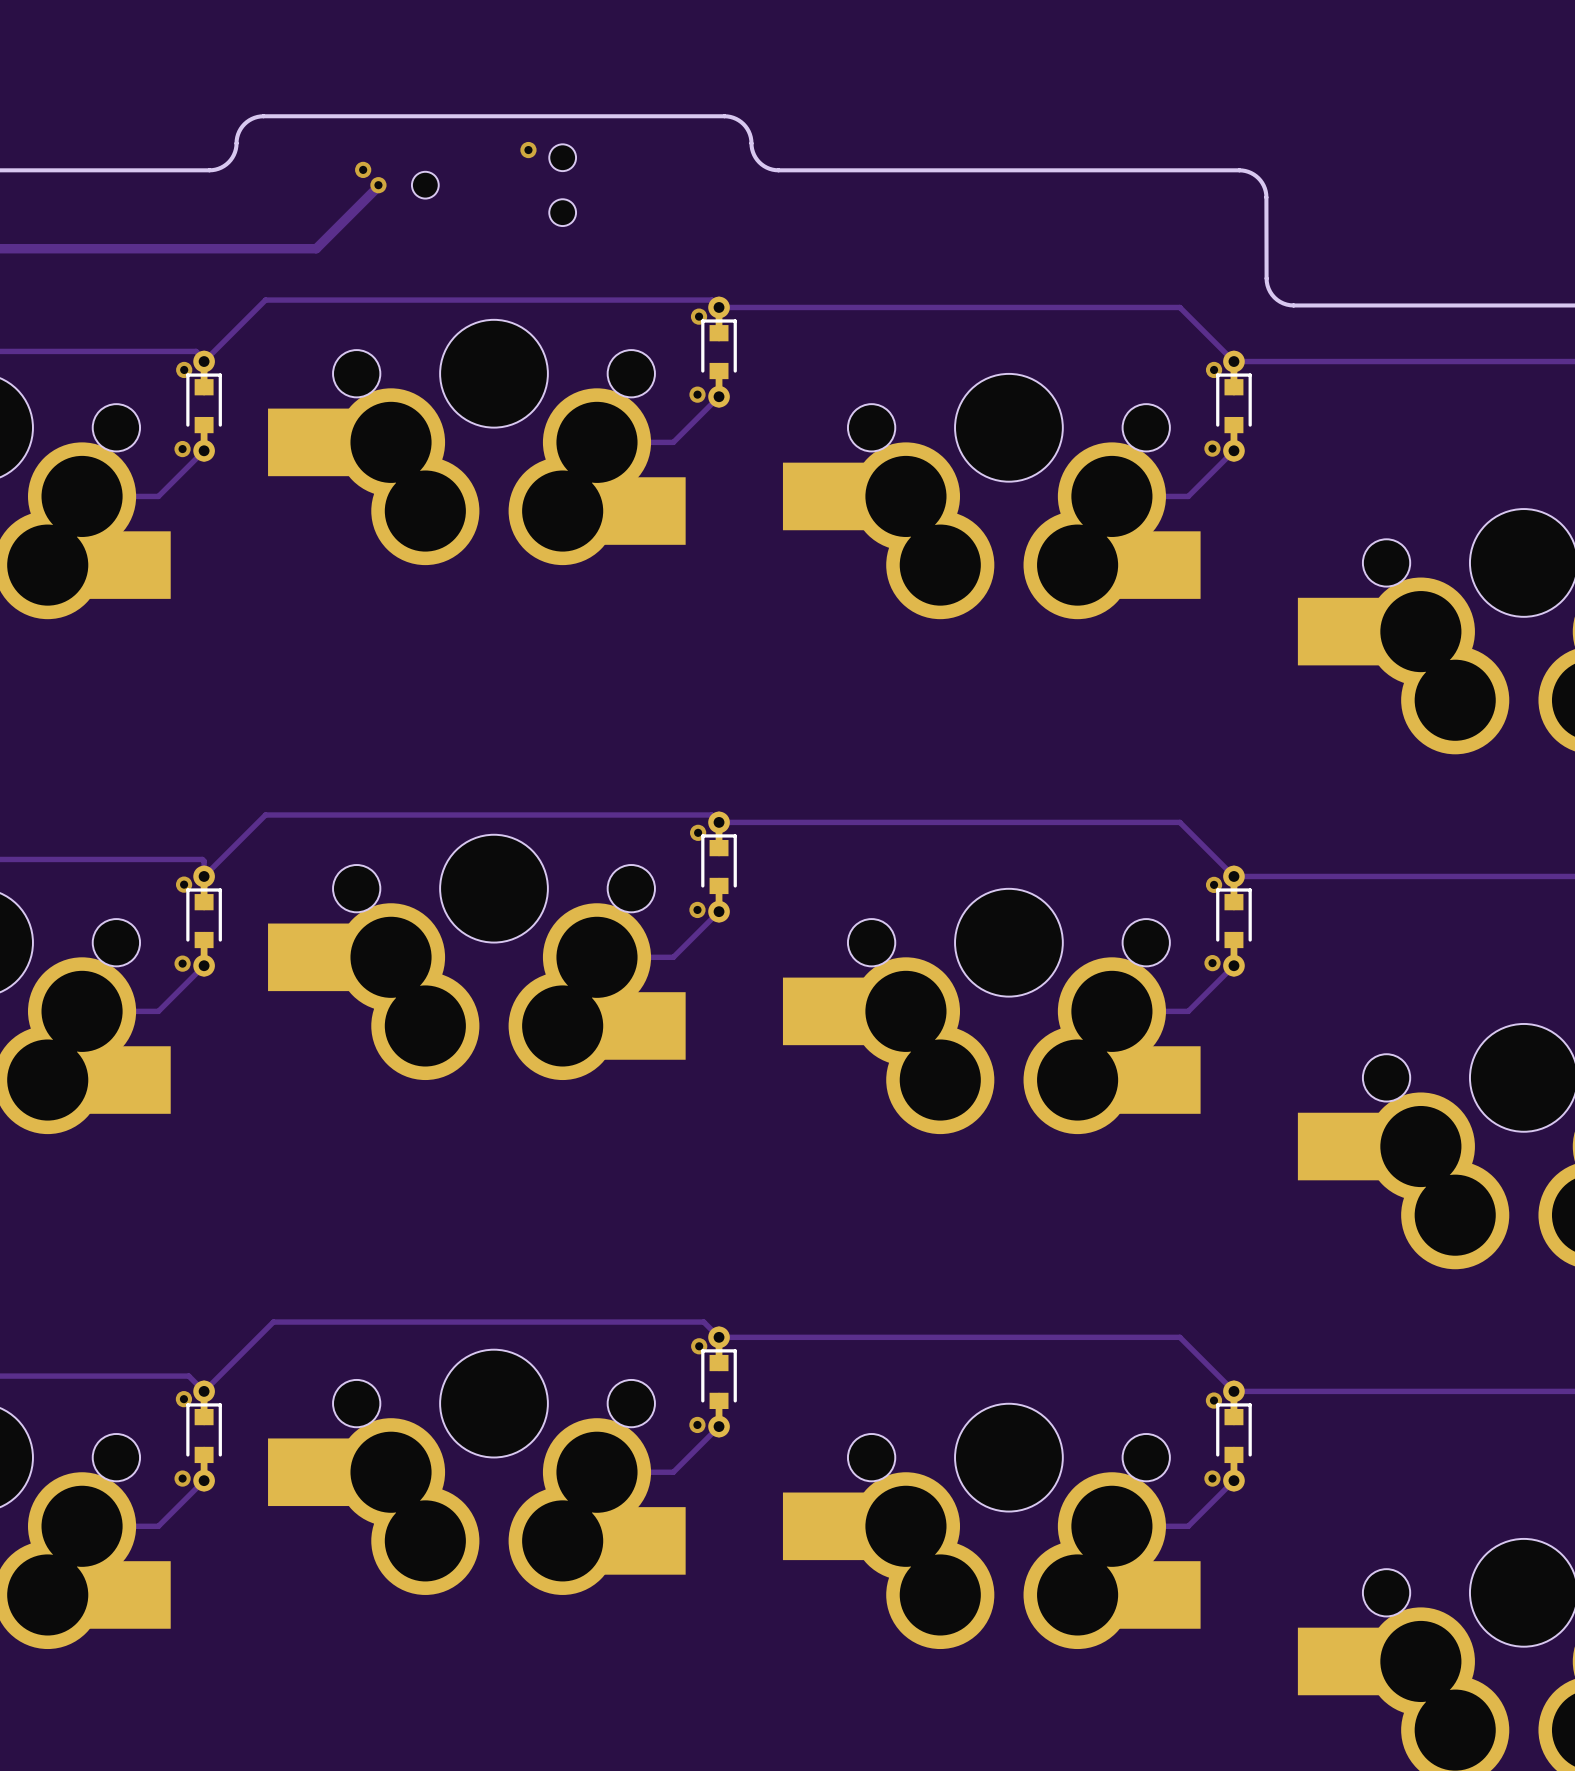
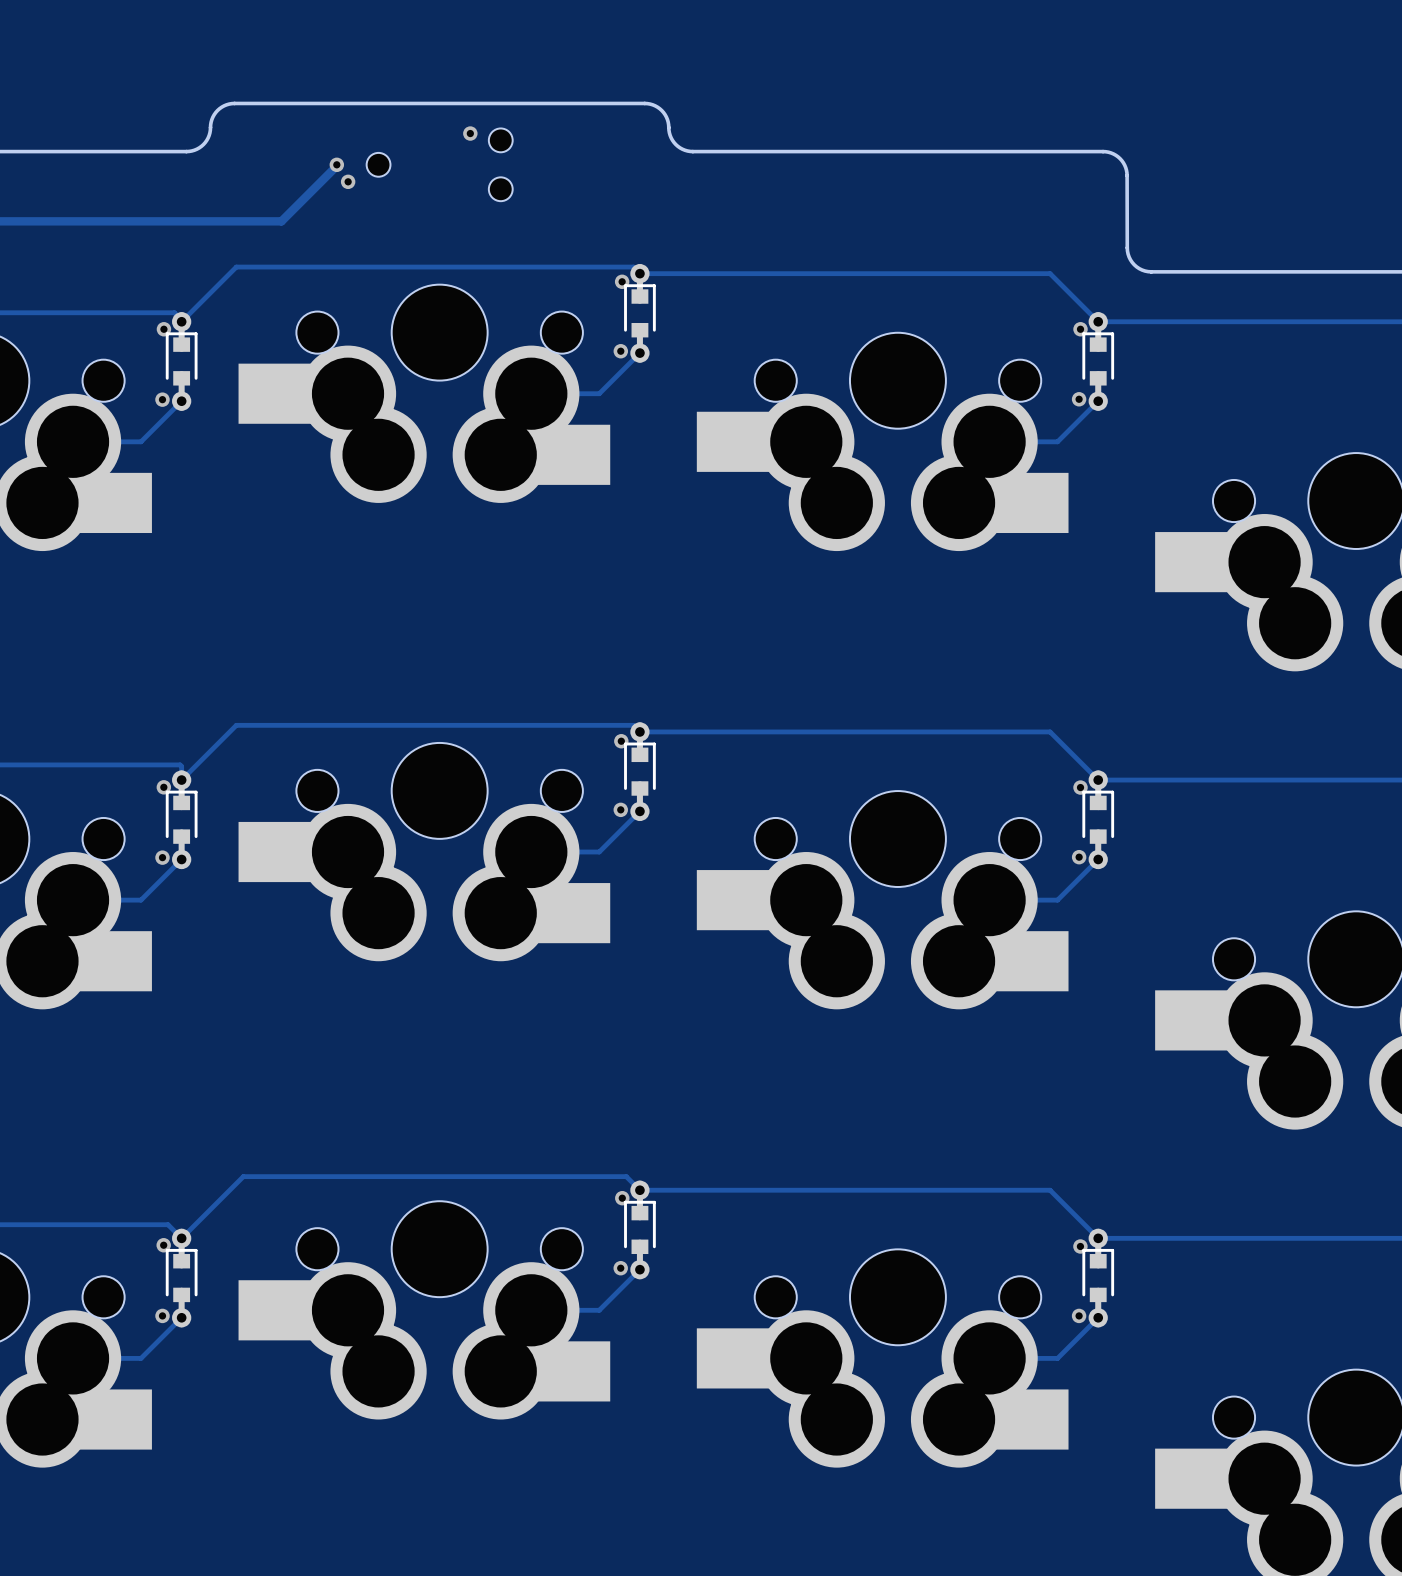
via position: (363, 169) -> (348, 181)

